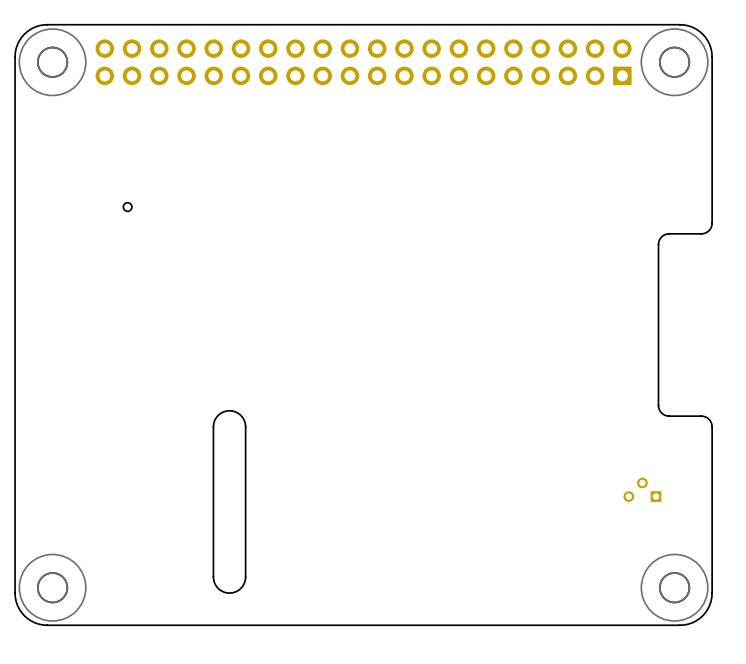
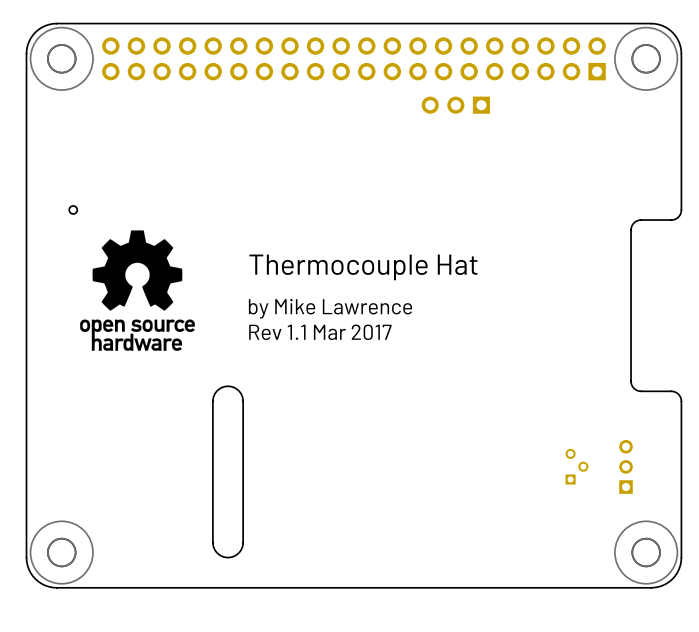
part: none -> (455, 105)
part position: (127, 207) -> (73, 209)
drawing: none -> [80, 230, 195, 351]
text: none -> Thermocouple Hat (363, 267)
text: none -> by Mike Lawrence (330, 308)
text: none -> Rev 1.1 Mar 2017 (320, 332)
part rotation: 0° (642, 489) -> 90° clockwise (576, 466)
part position: (642, 489) -> (576, 466)
part: none -> (626, 466)

